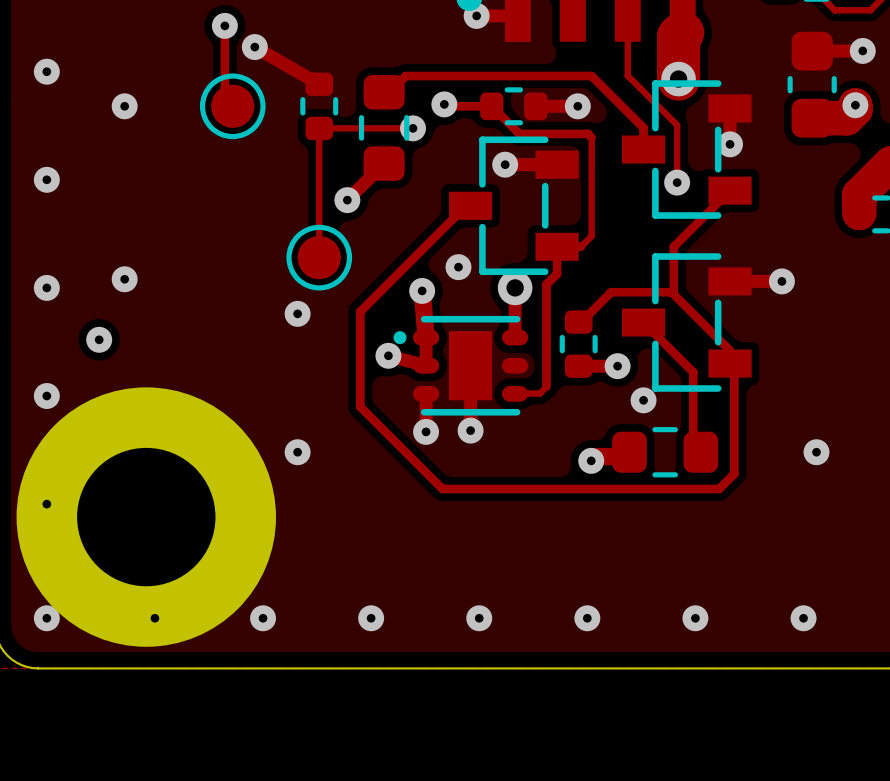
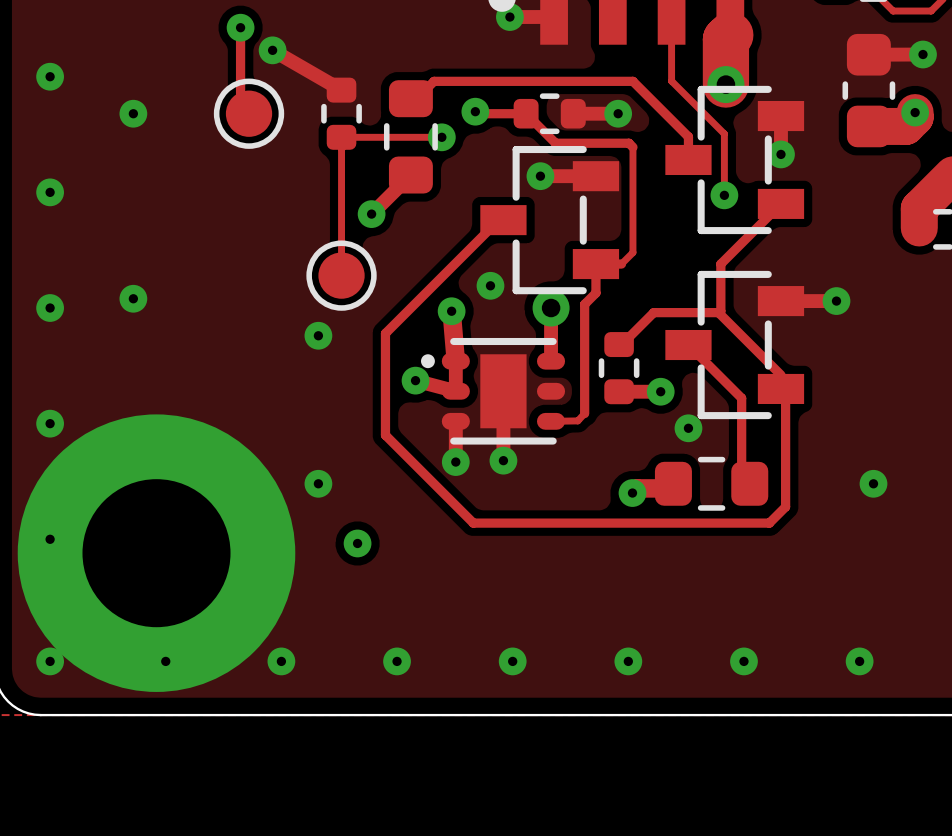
via: (99, 339) -> none
via: none -> (357, 543)

